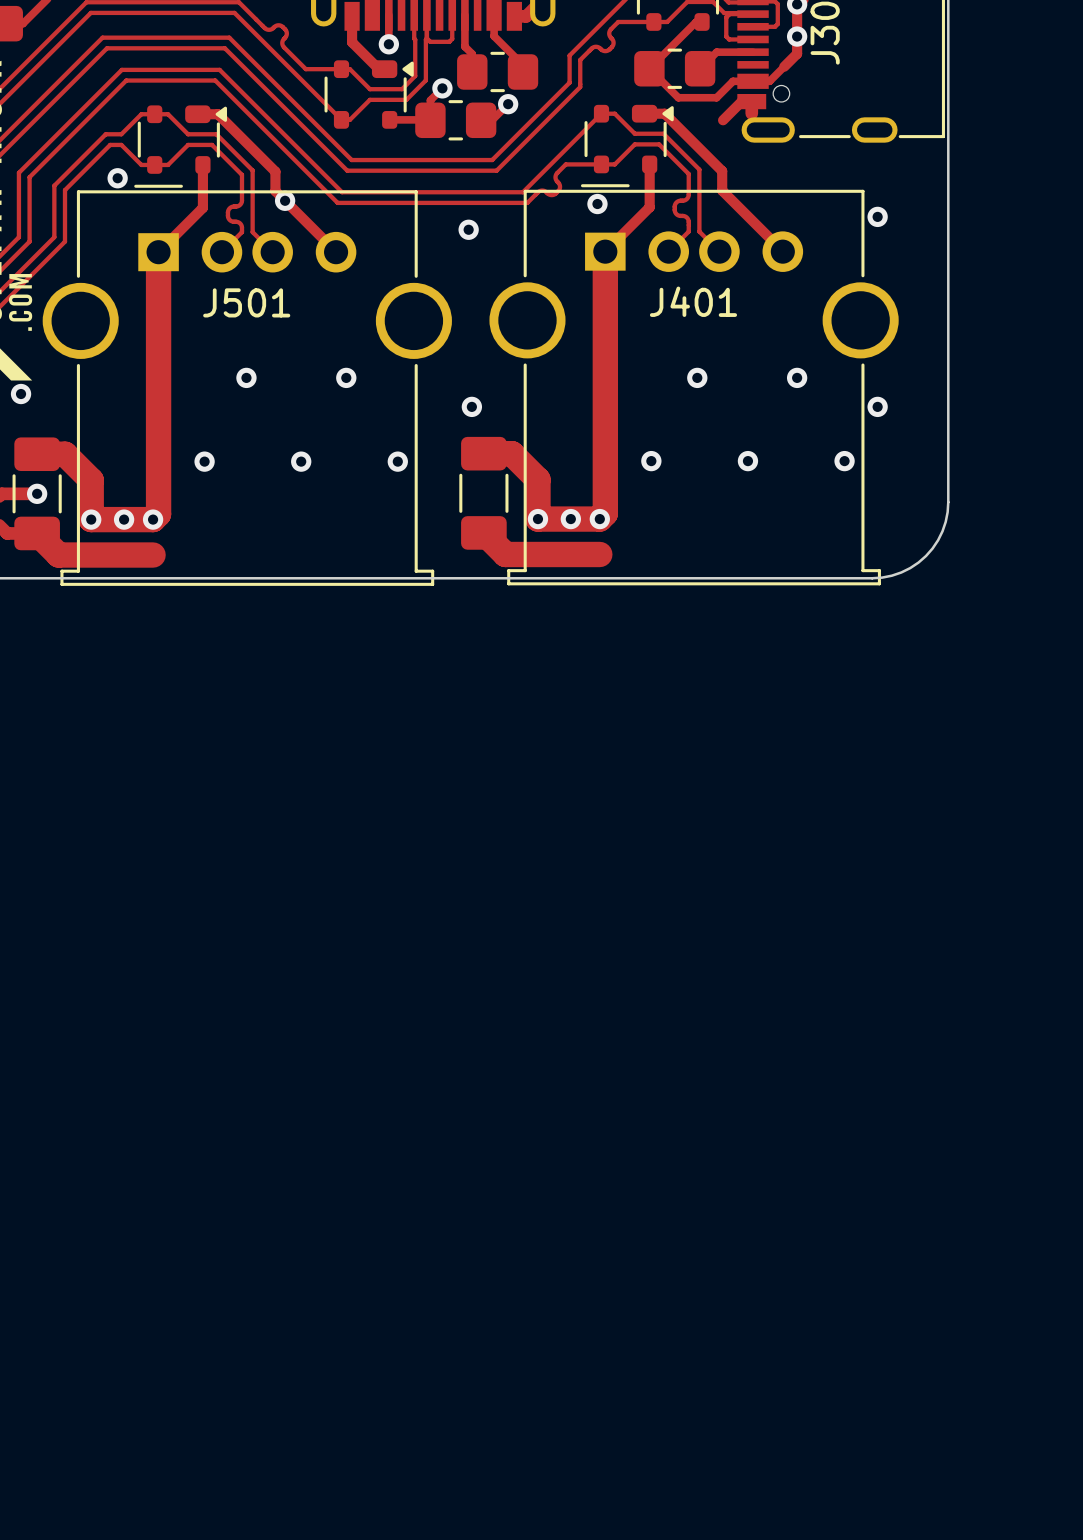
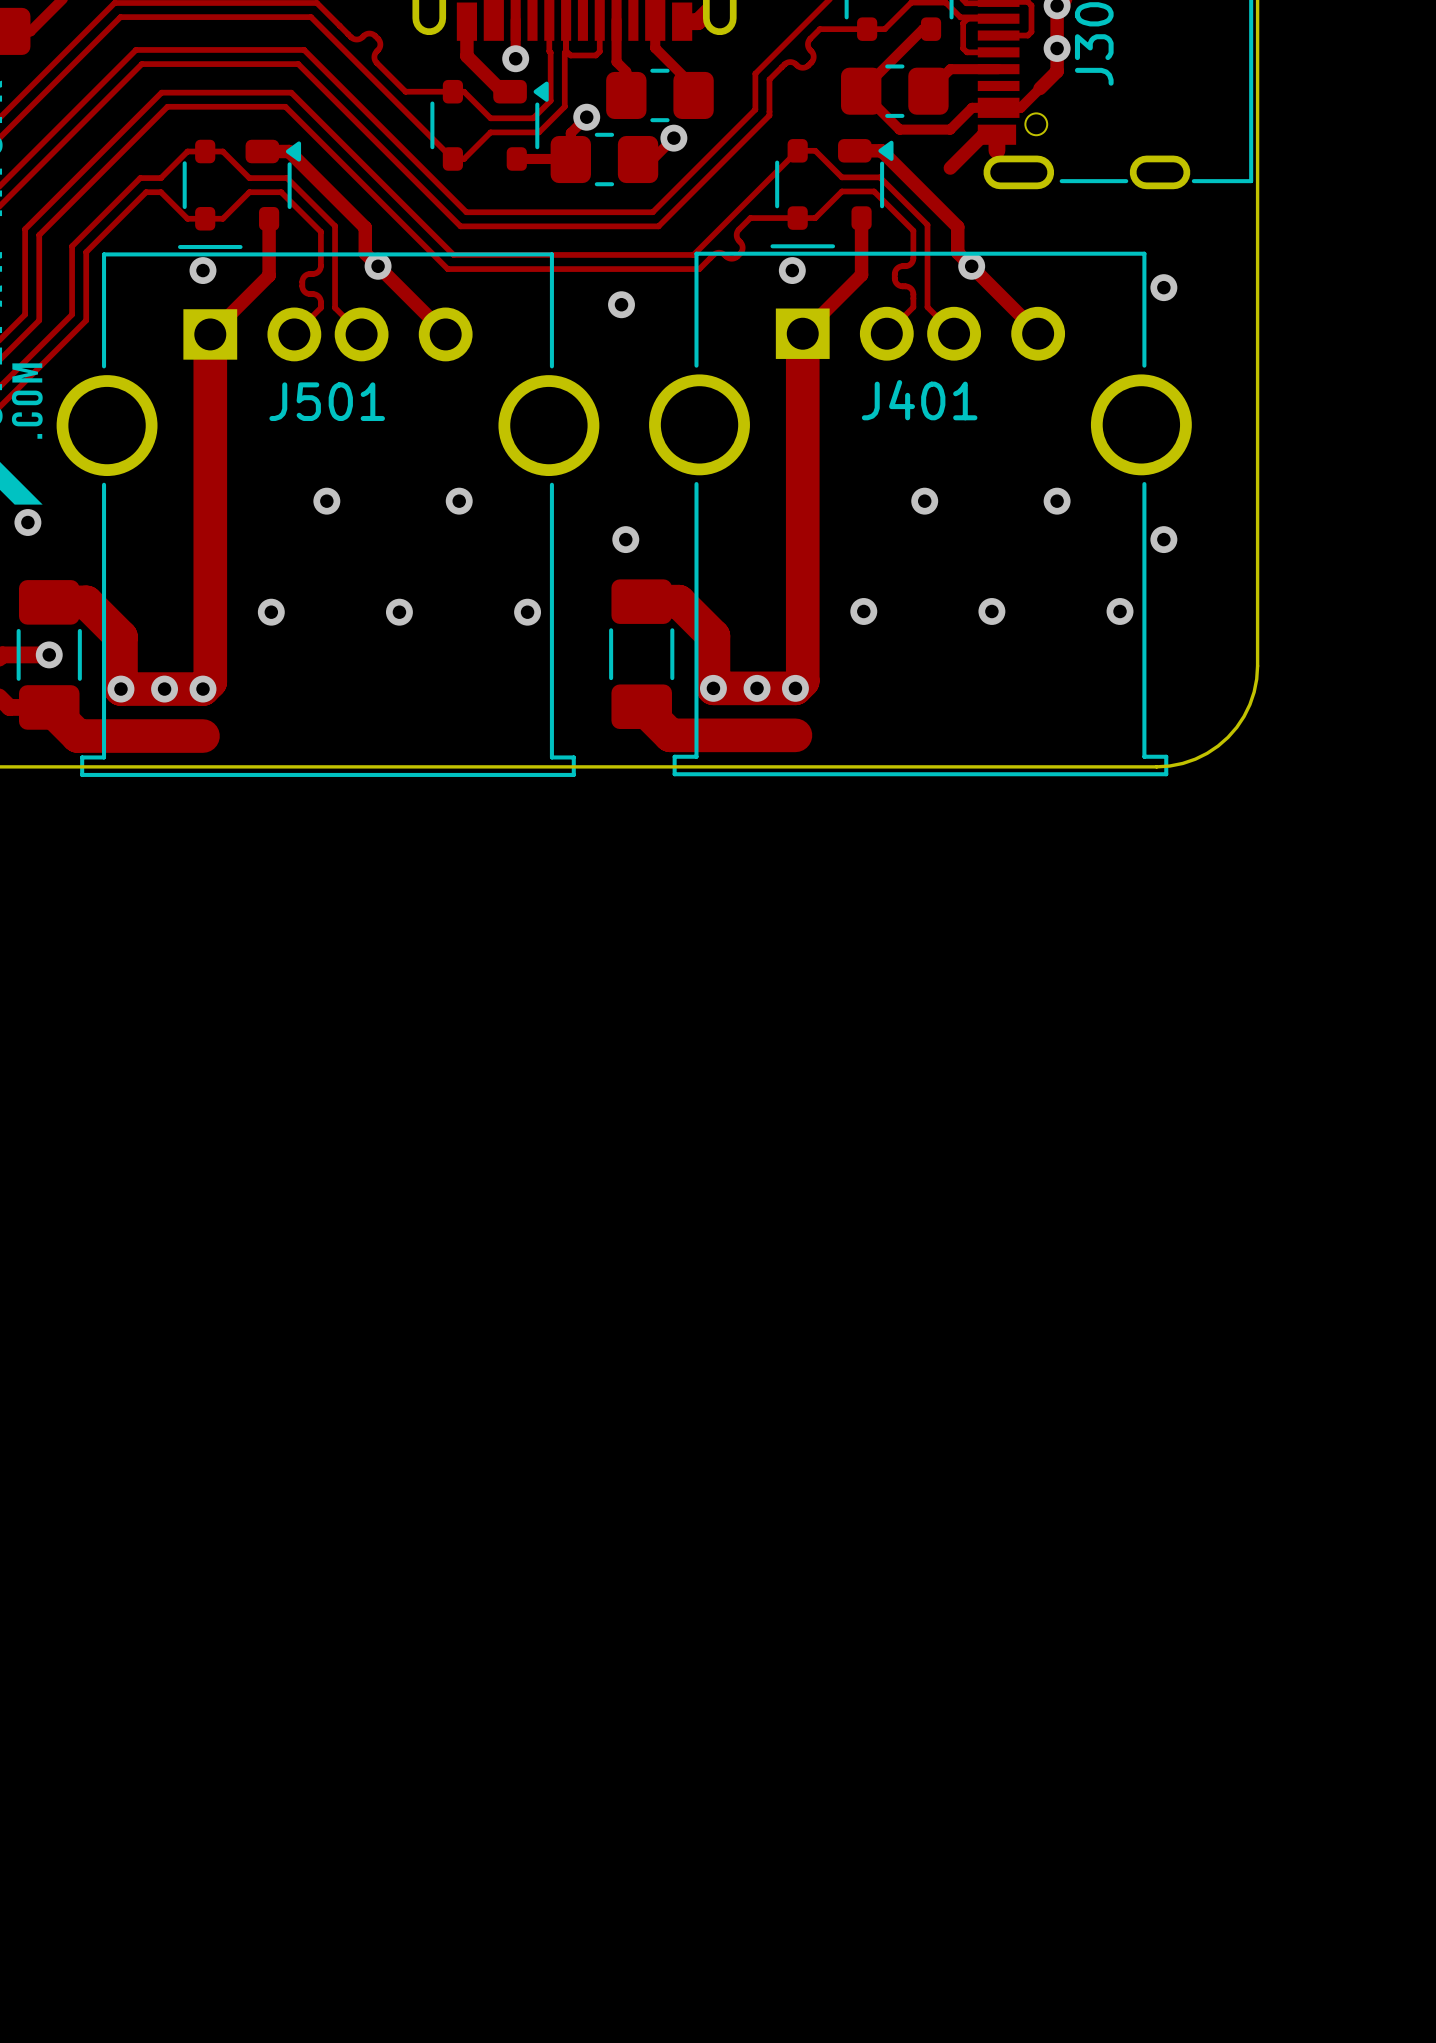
track: none -> (958, 159) (950, 168)
via position: (117, 178) -> (202, 270)
via: none -> (971, 266)

